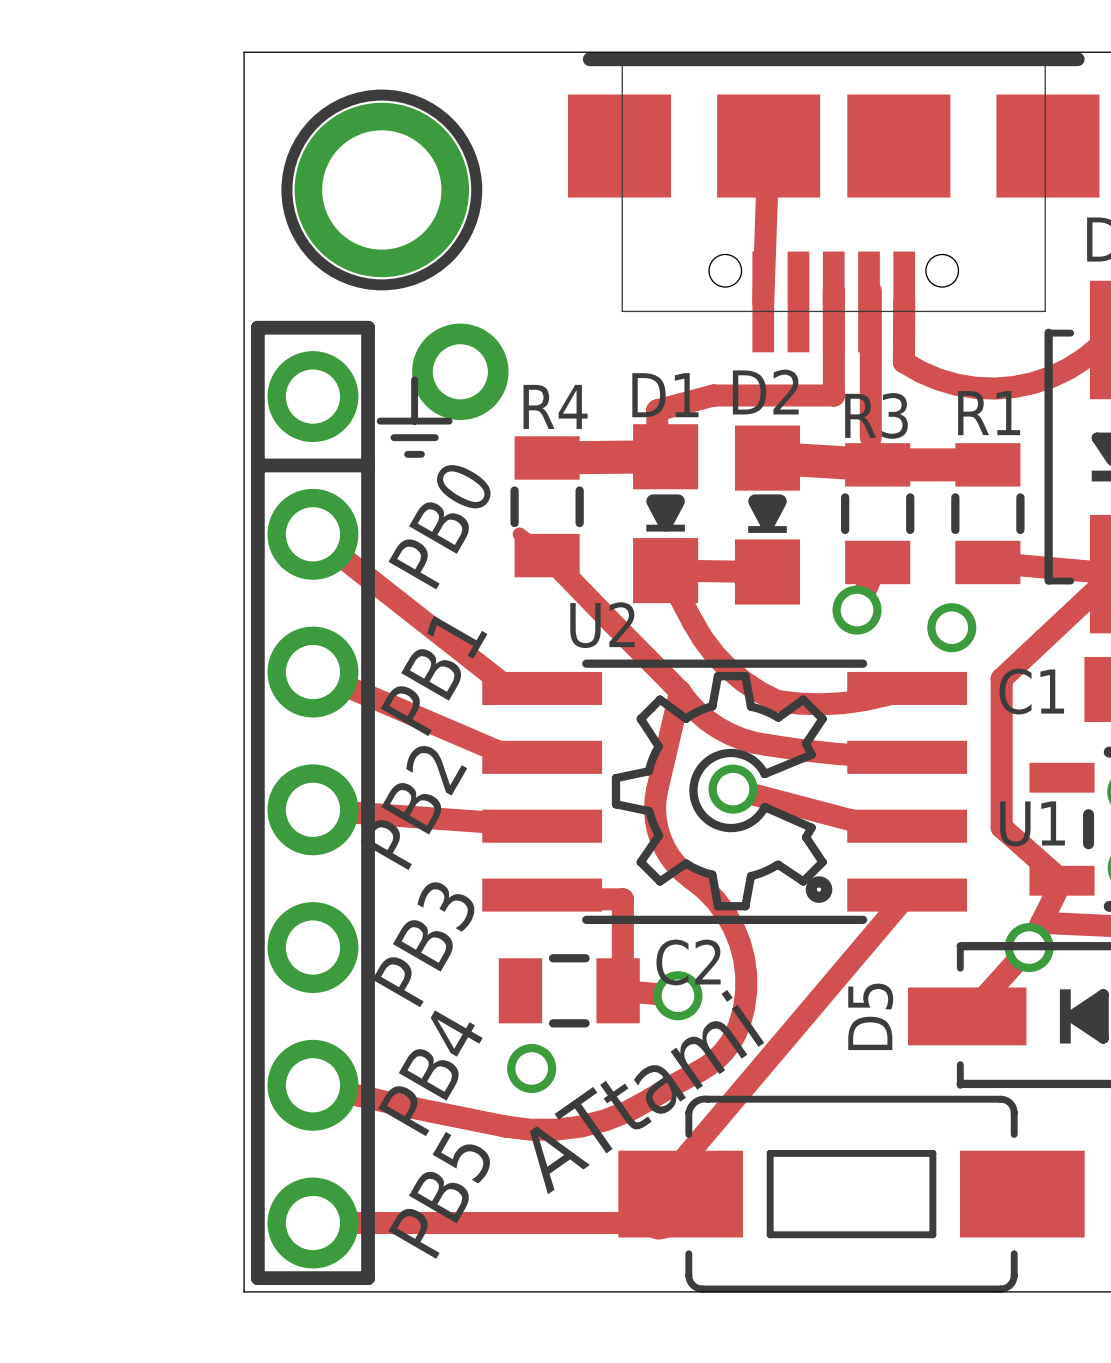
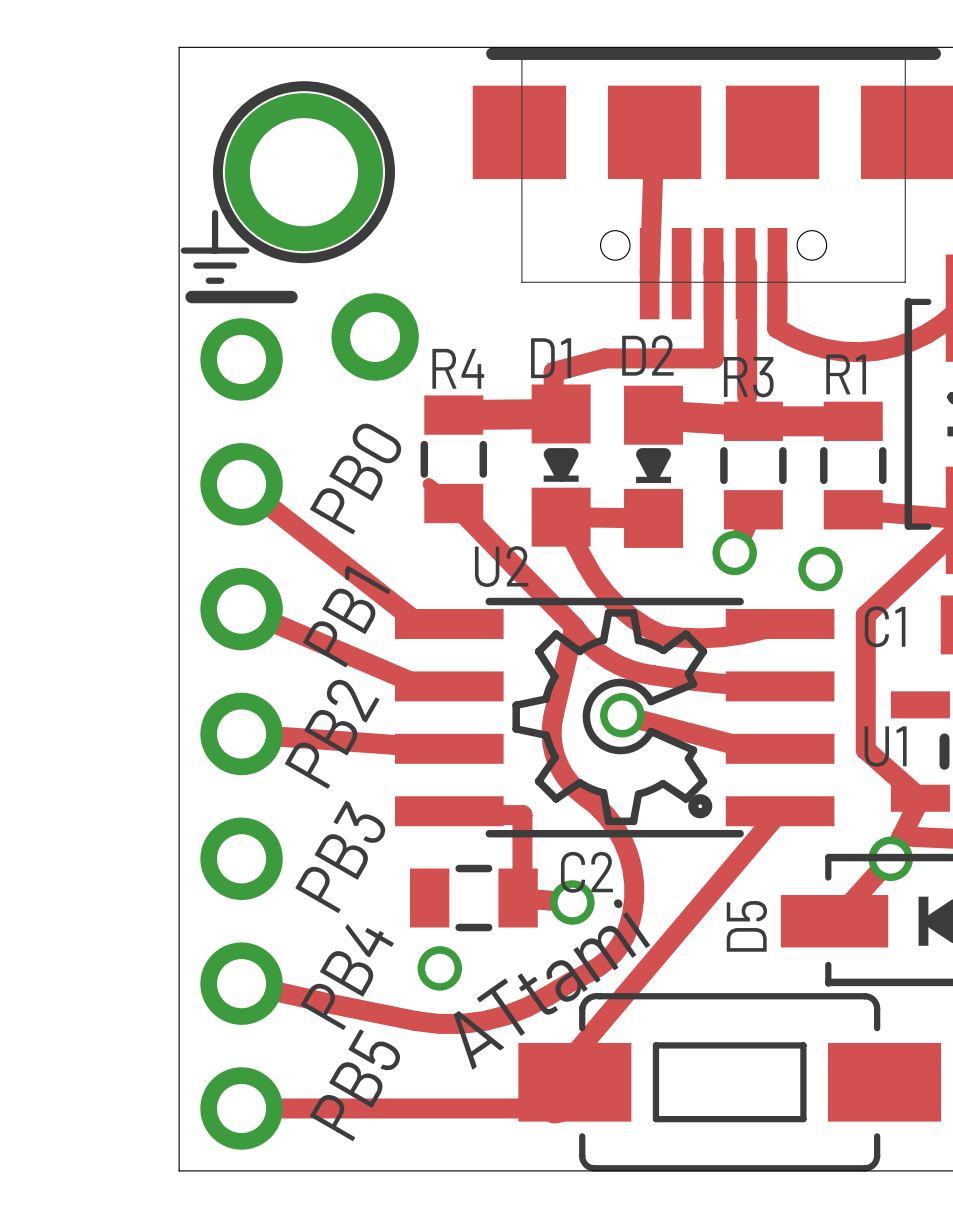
line: (257, 327) (257, 1278) (368, 1278) (368, 327) -> none
line: (414, 379) (414, 421) -> (215, 213) (215, 250)
line: (380, 421) (449, 421) -> (183, 250) (246, 250)
line: (393, 437) (435, 437) -> (196, 265) (233, 265)
line: (407, 454) (421, 454) -> (208, 280) (221, 280)
line: (257, 465) (368, 465) -> none

